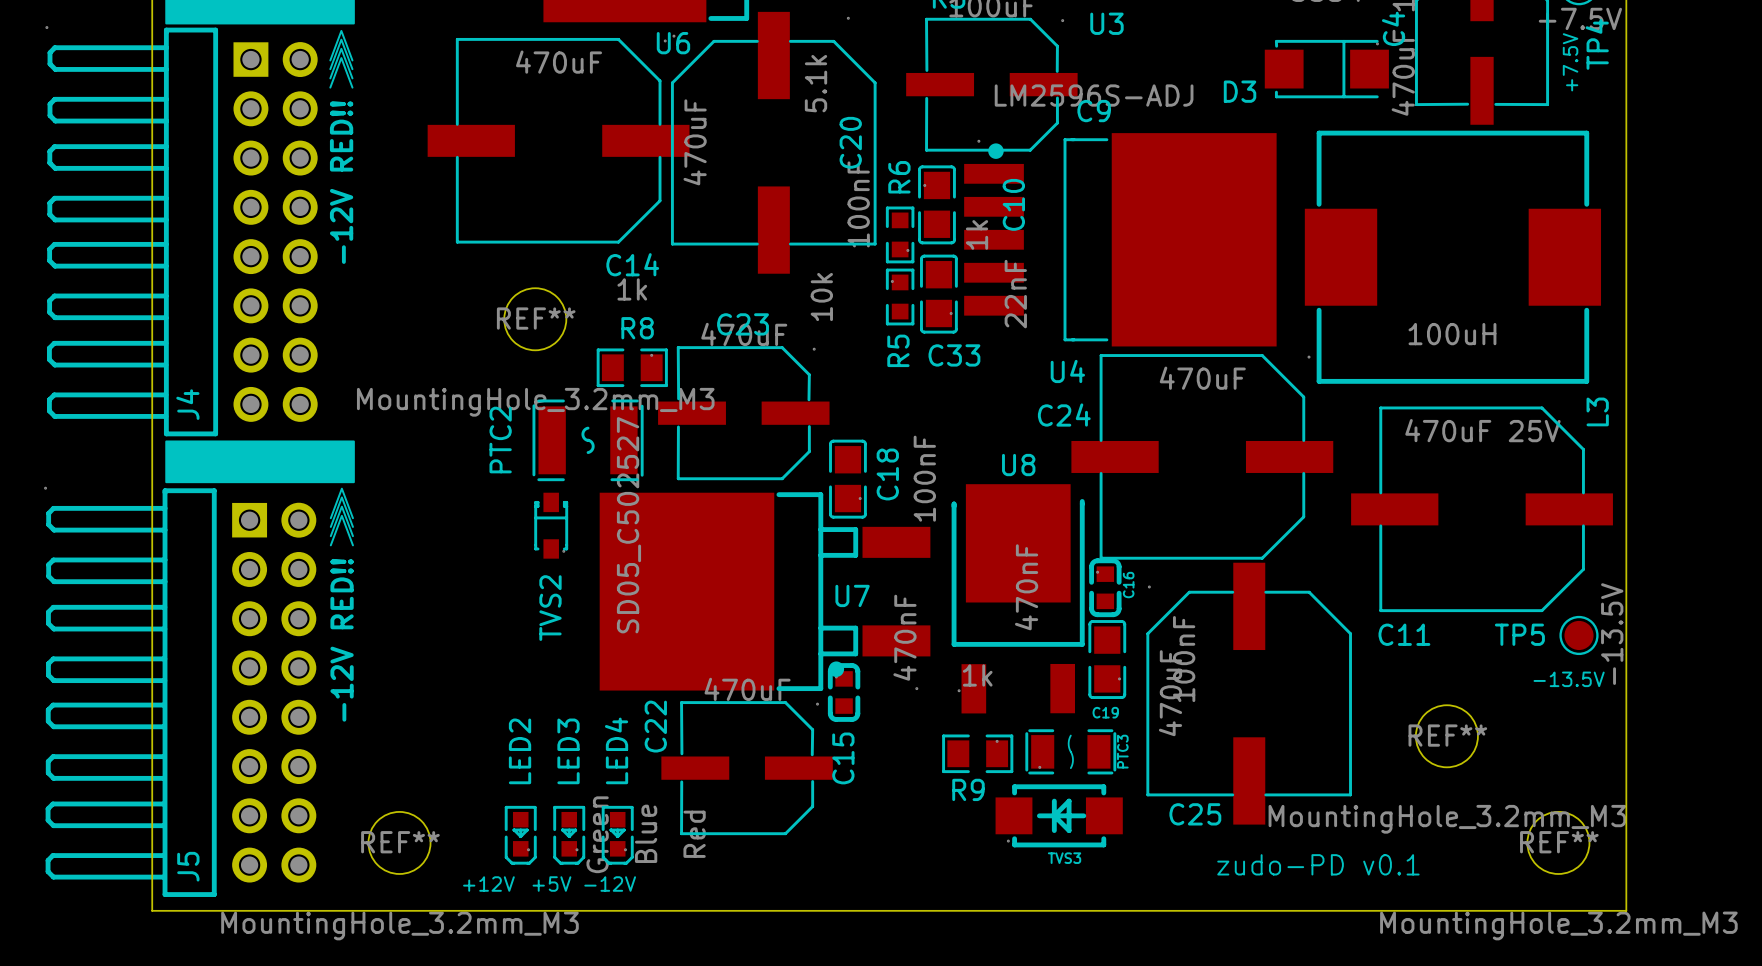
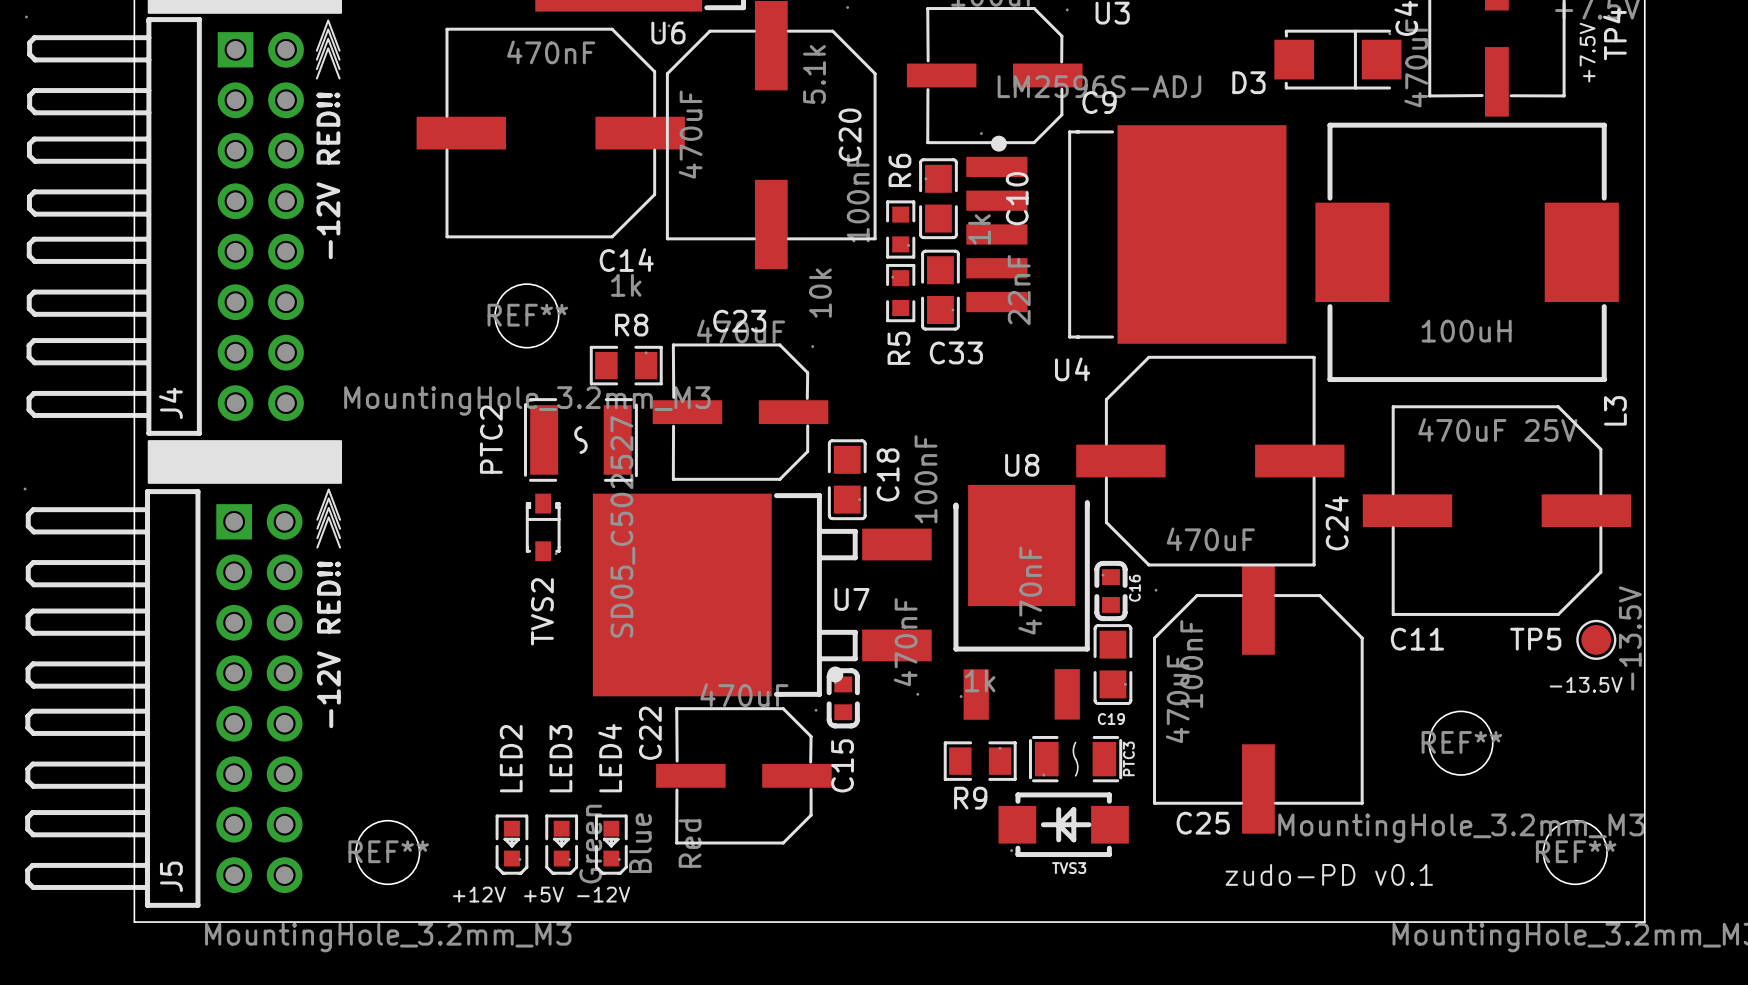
C14 value: 470uF (559, 62) -> 470nF (551, 52)
C24 rotation: 0° (1202, 456) -> 180° (1210, 461)

